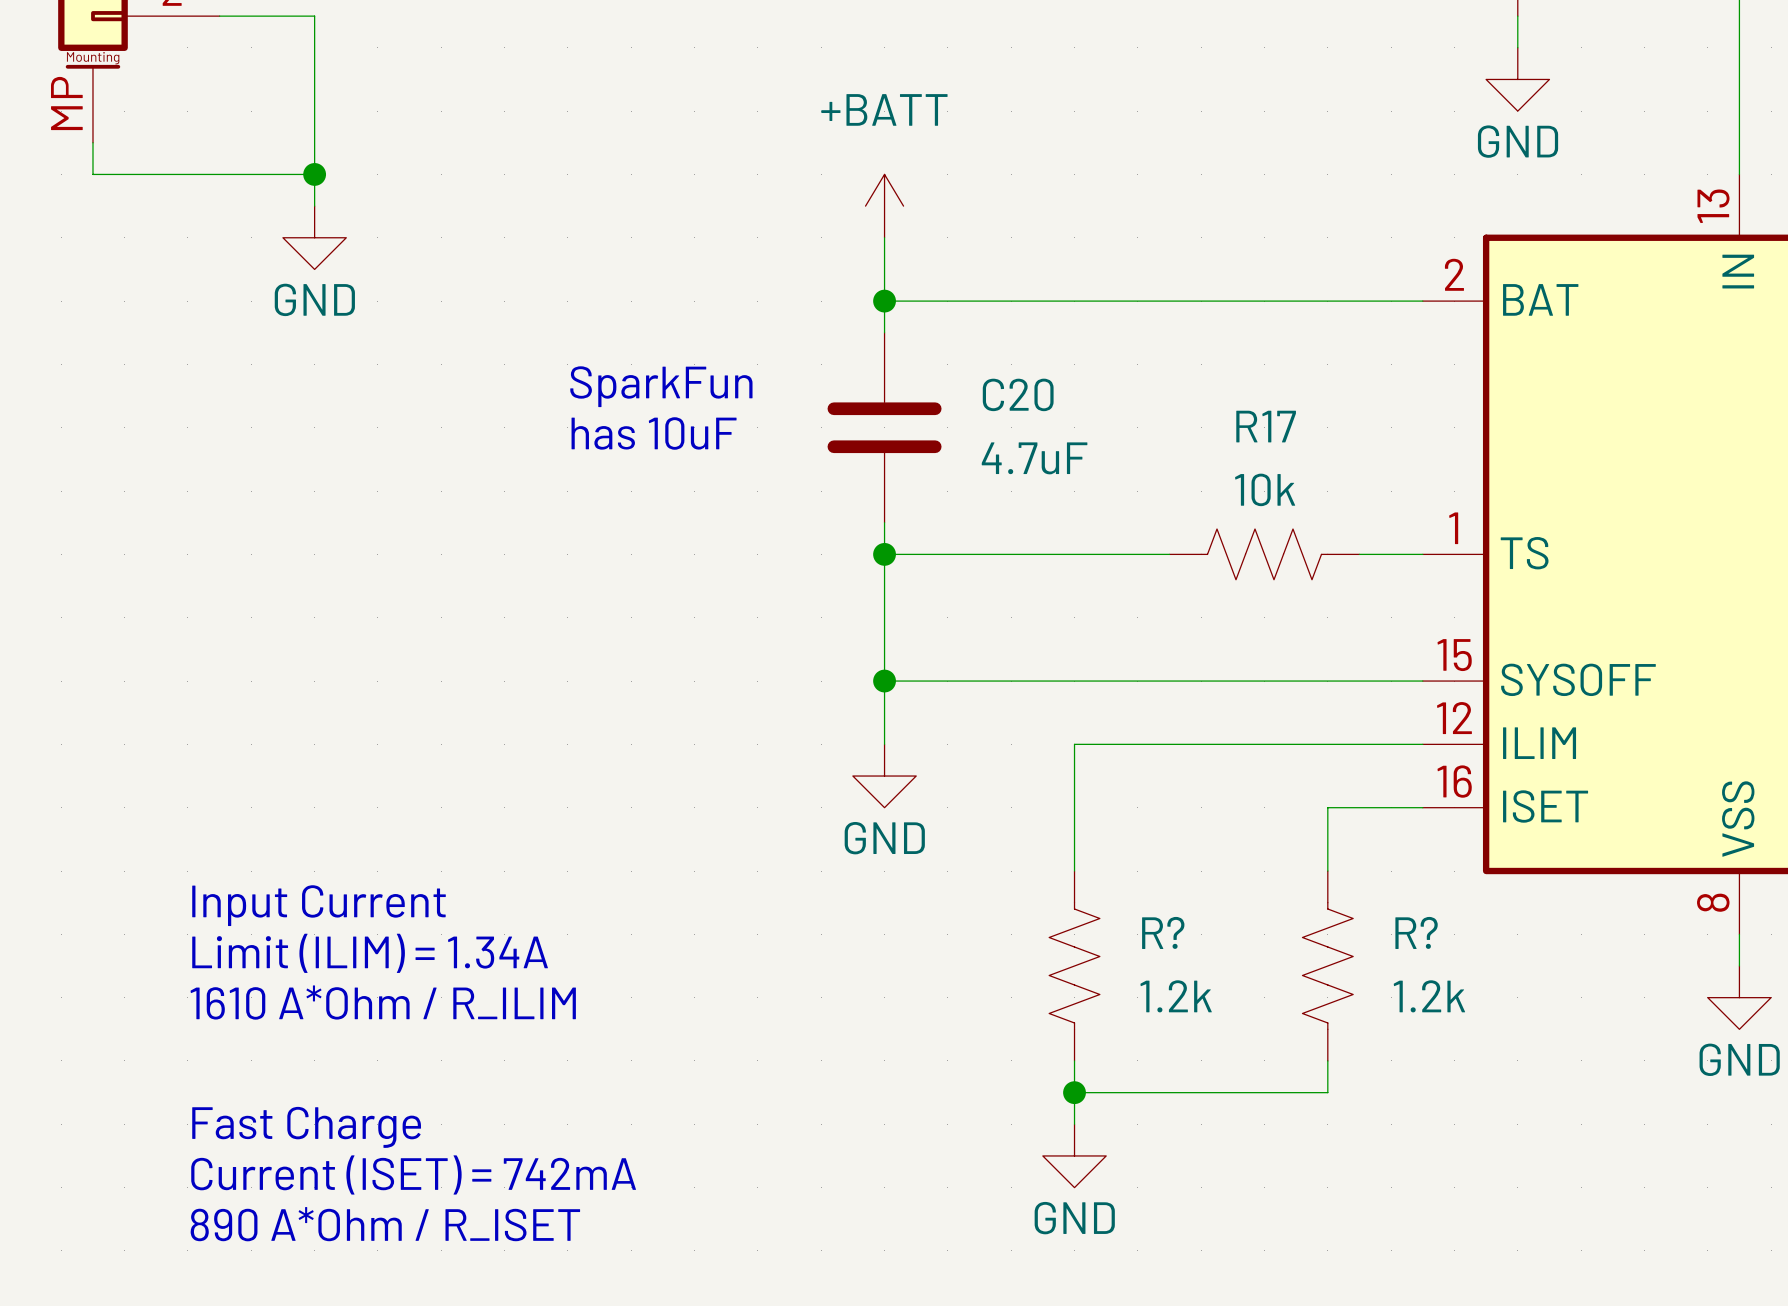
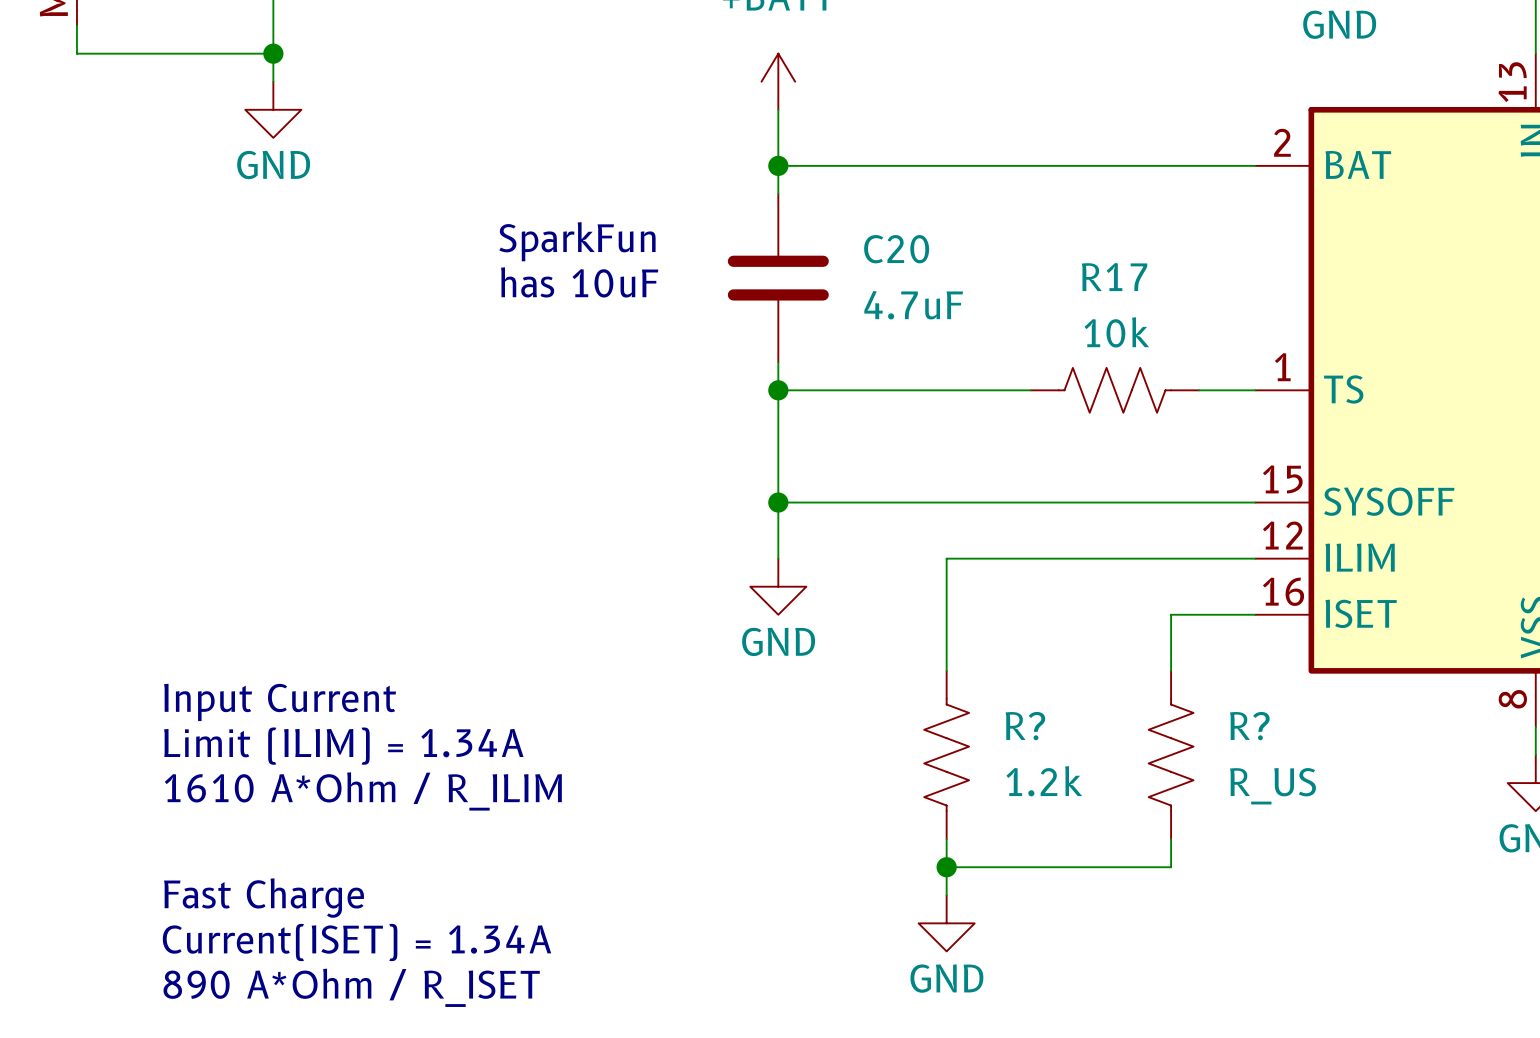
R? value: 1.2k (1429, 996) -> R_US (1273, 786)
text: Current (ISET) = 742mA (413, 1174) -> Current(ISET) = 1.34A (357, 942)

